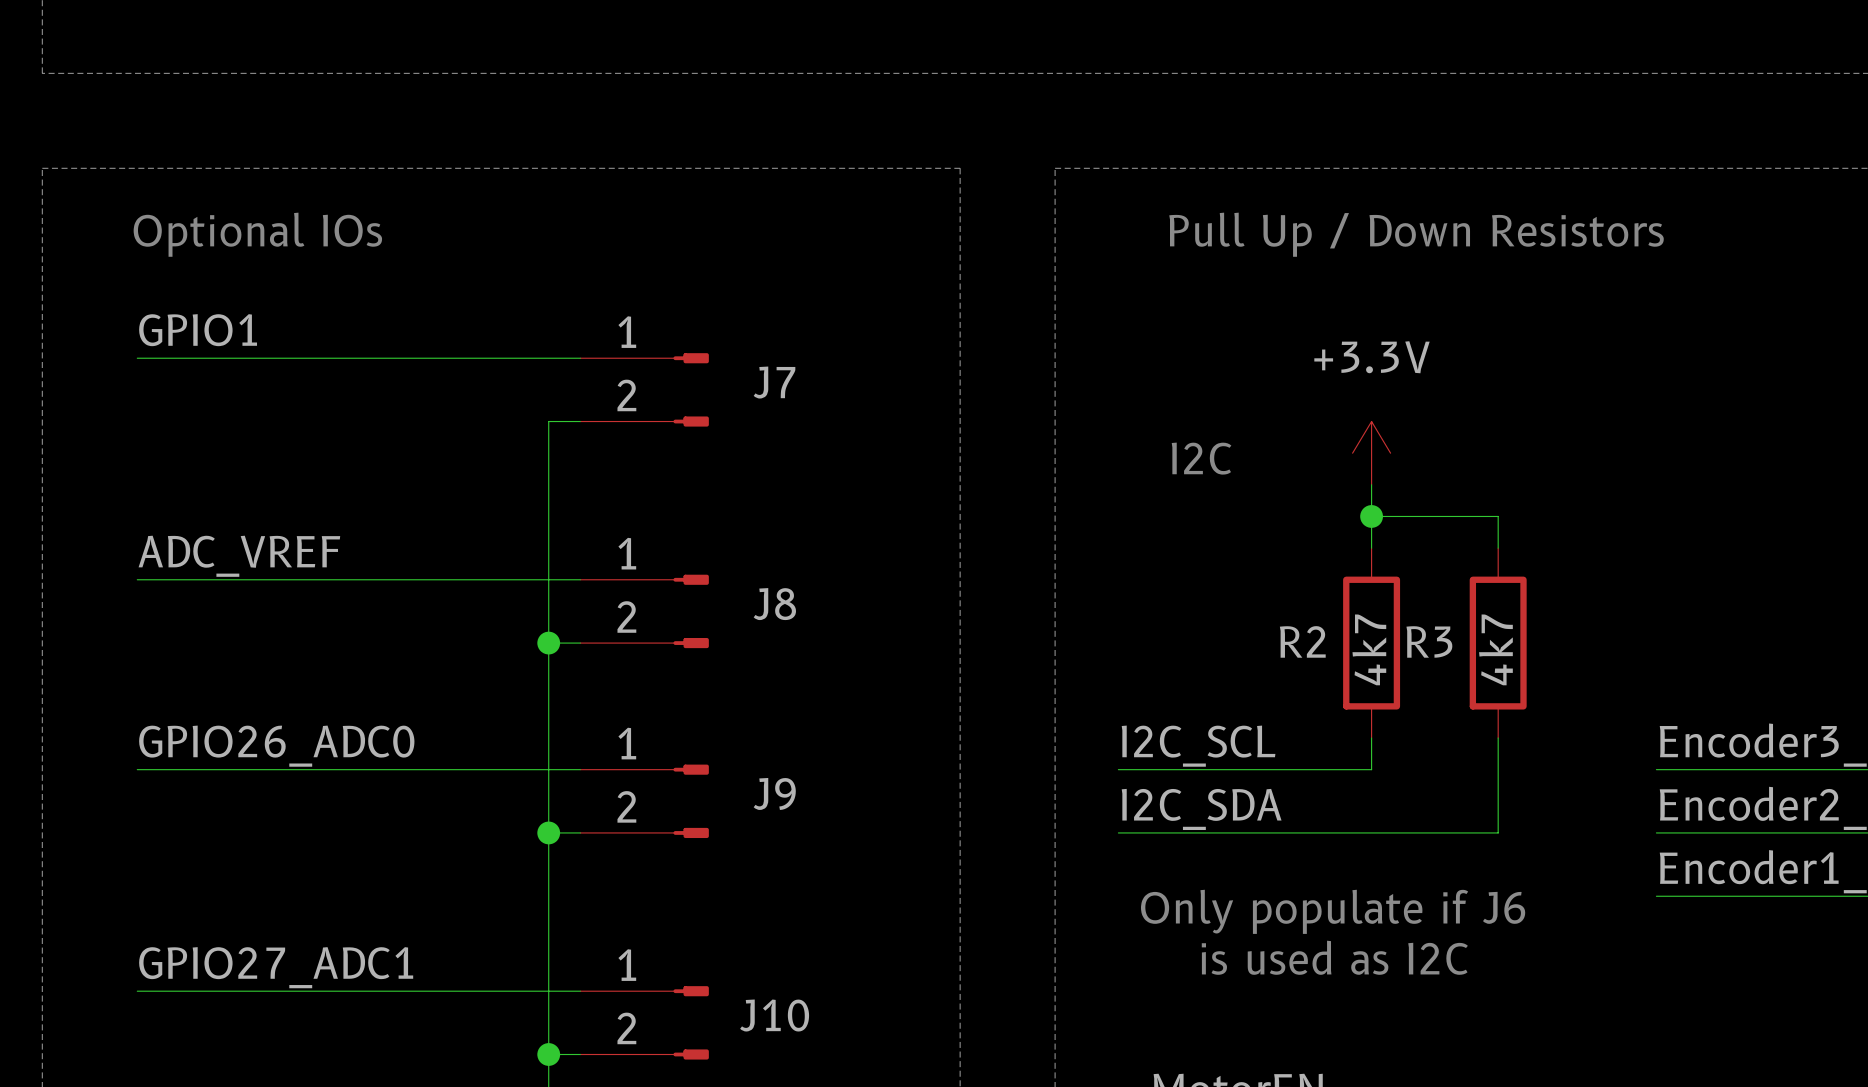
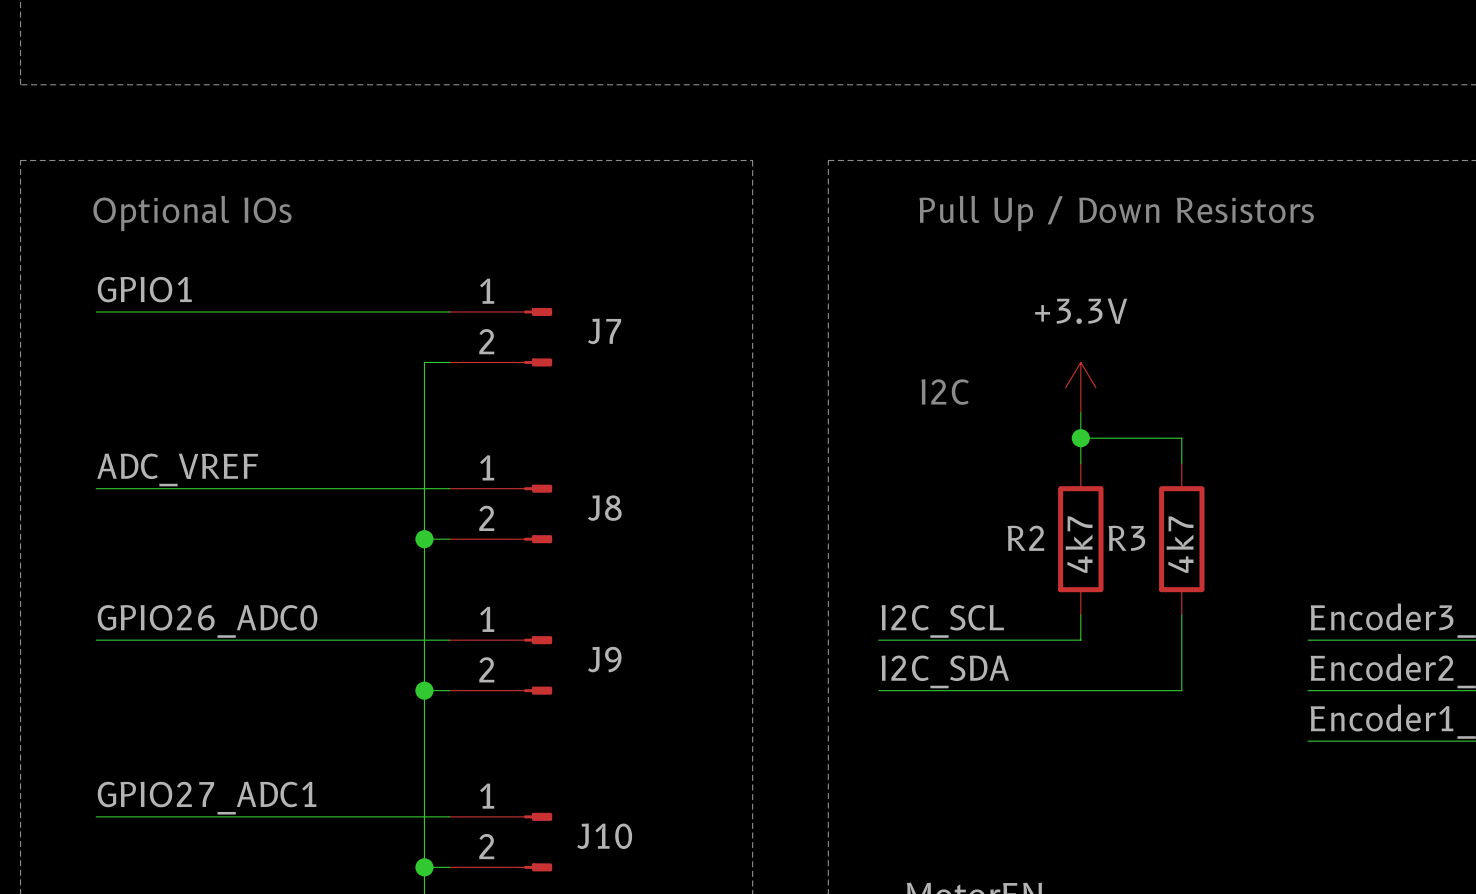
text: Only populate if J6 (1333, 911) -> none
text: is used as I2C (1334, 957) -> none

